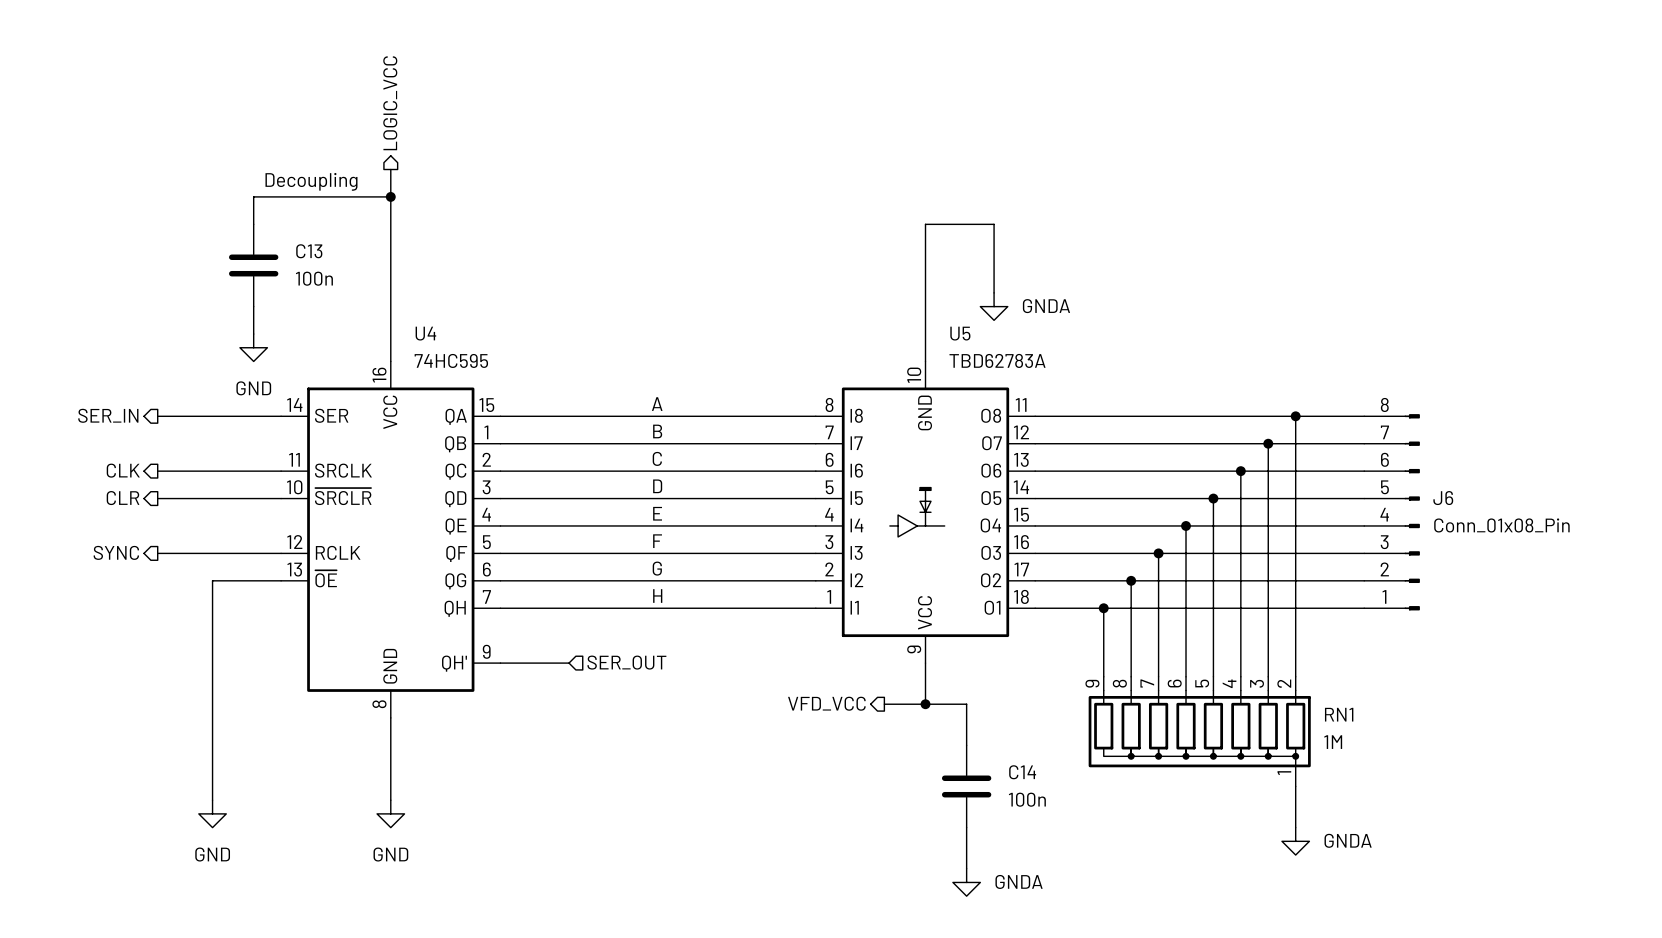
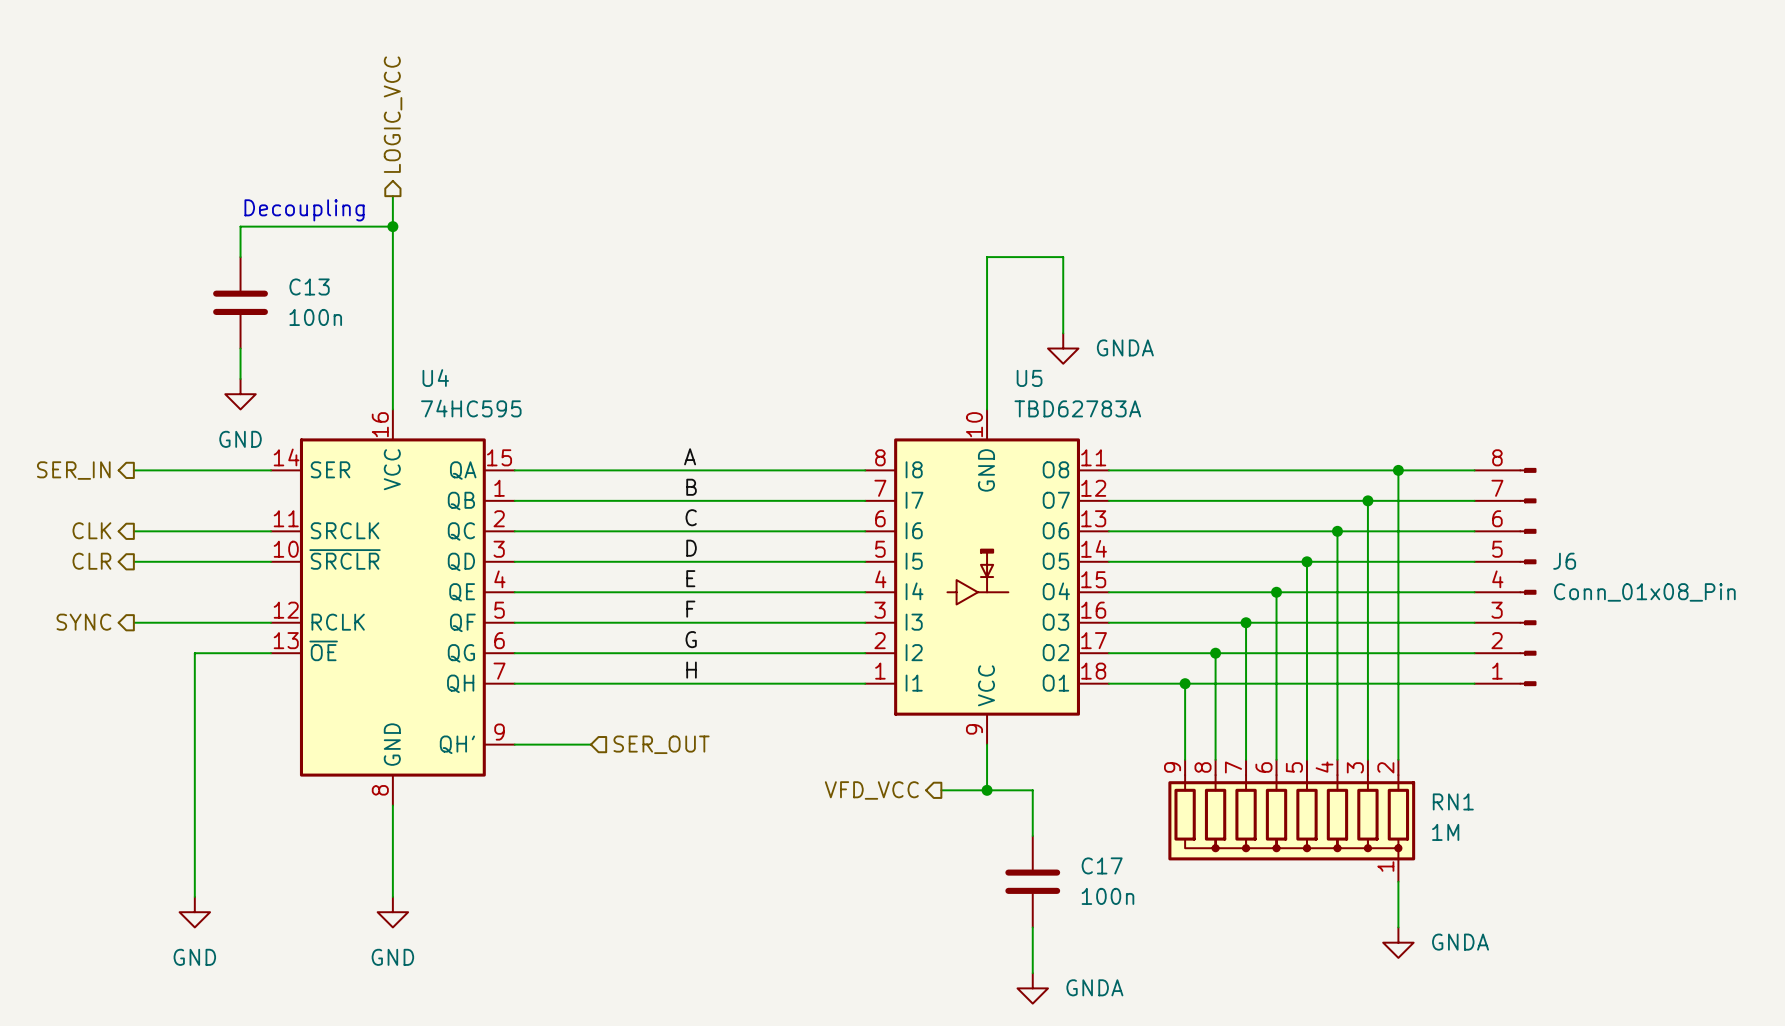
C14 name: C14 (1022, 772) -> C17 (1102, 865)

